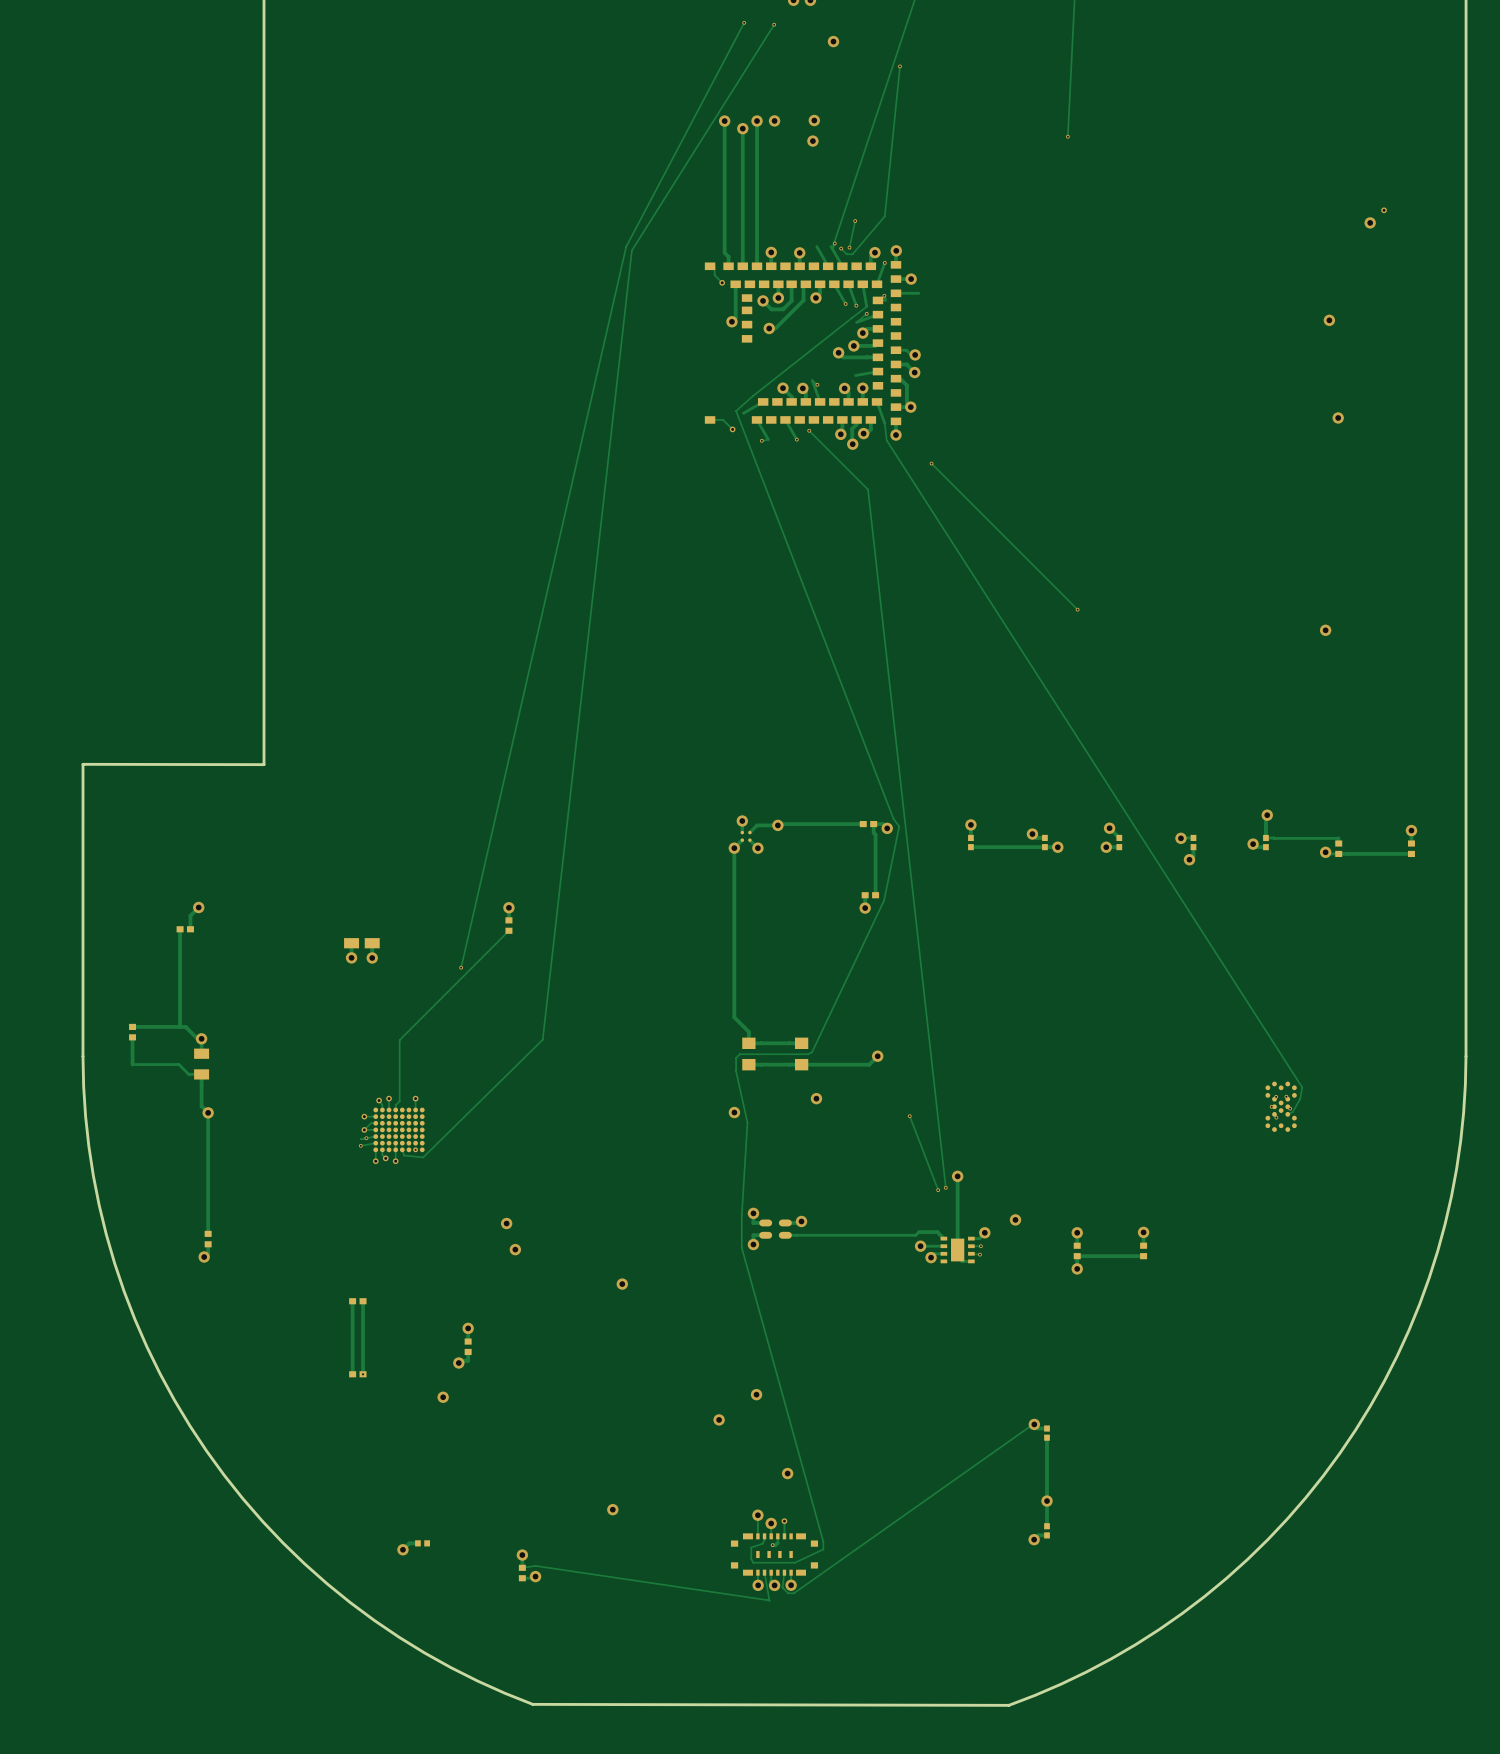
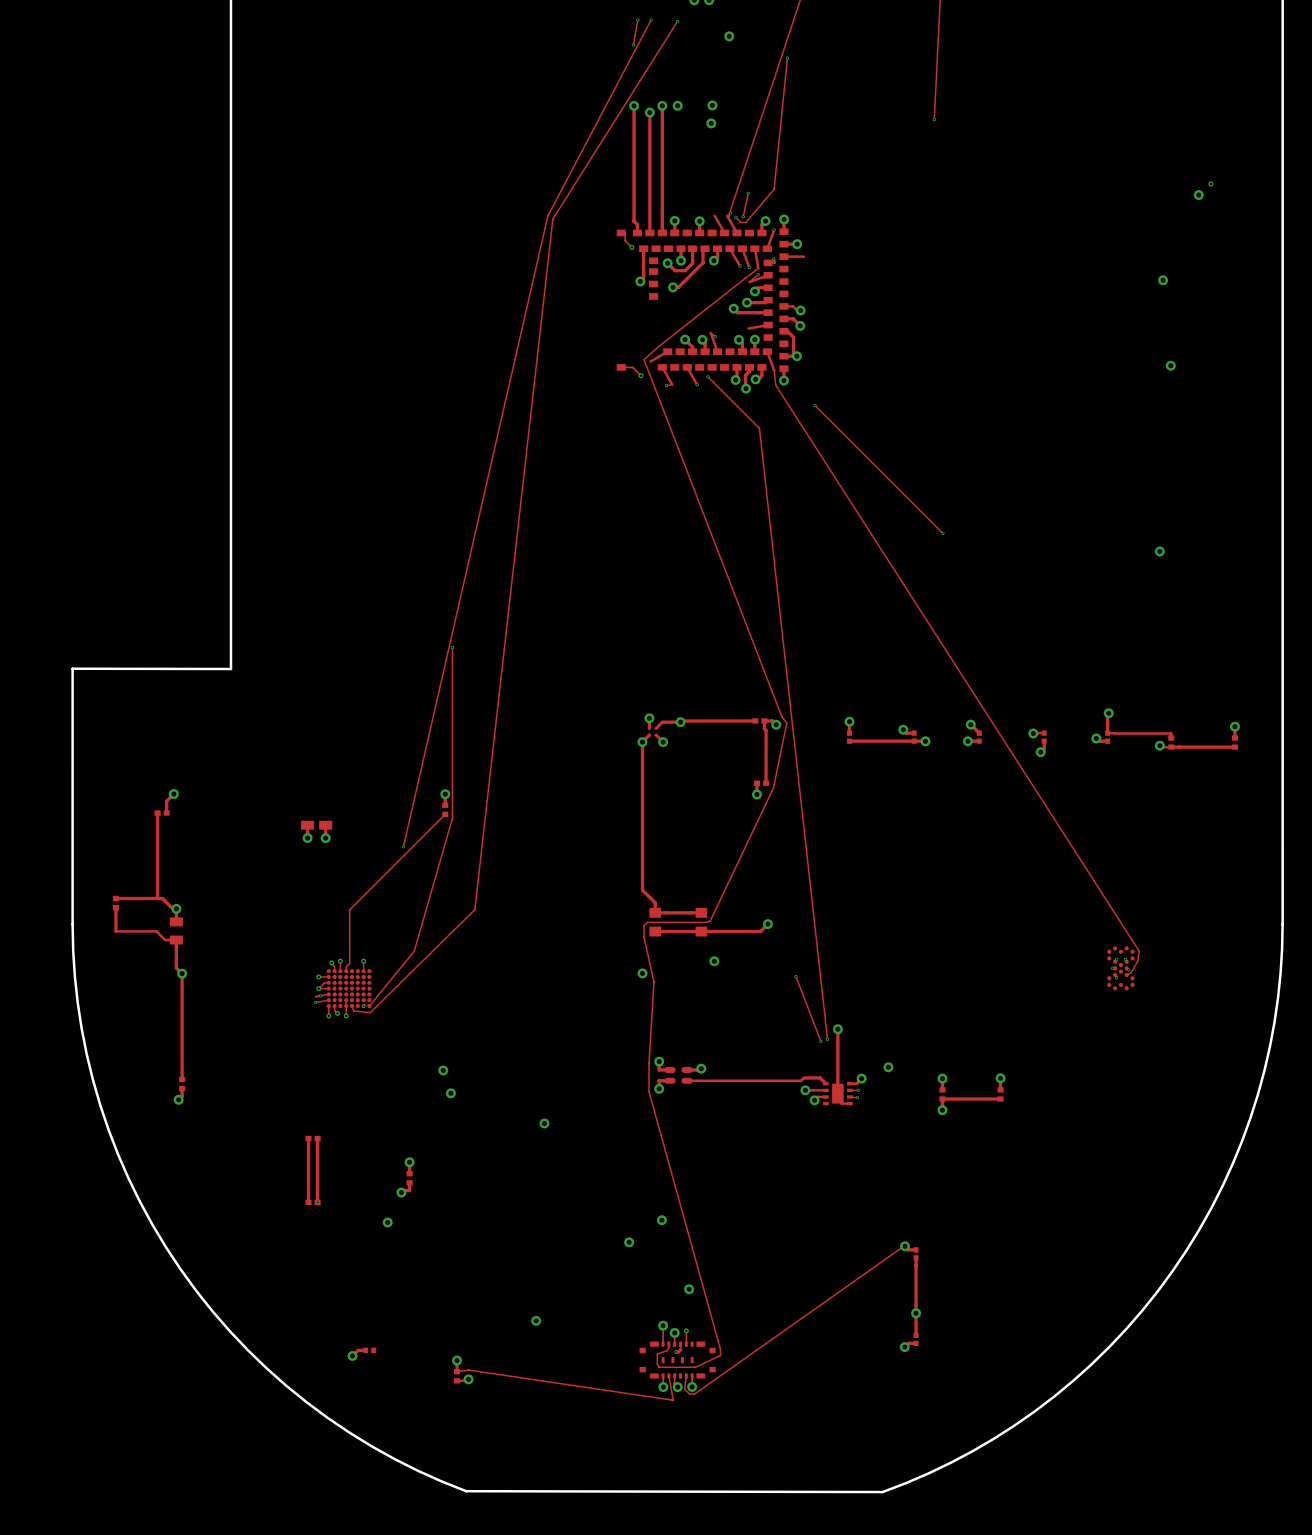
track: none -> (637, 19) (633, 44)
via: none -> (637, 19)
via: none -> (633, 44)
track: none -> (452, 647) (452, 818) (414, 951) (369, 1006)
via: none -> (452, 647)

